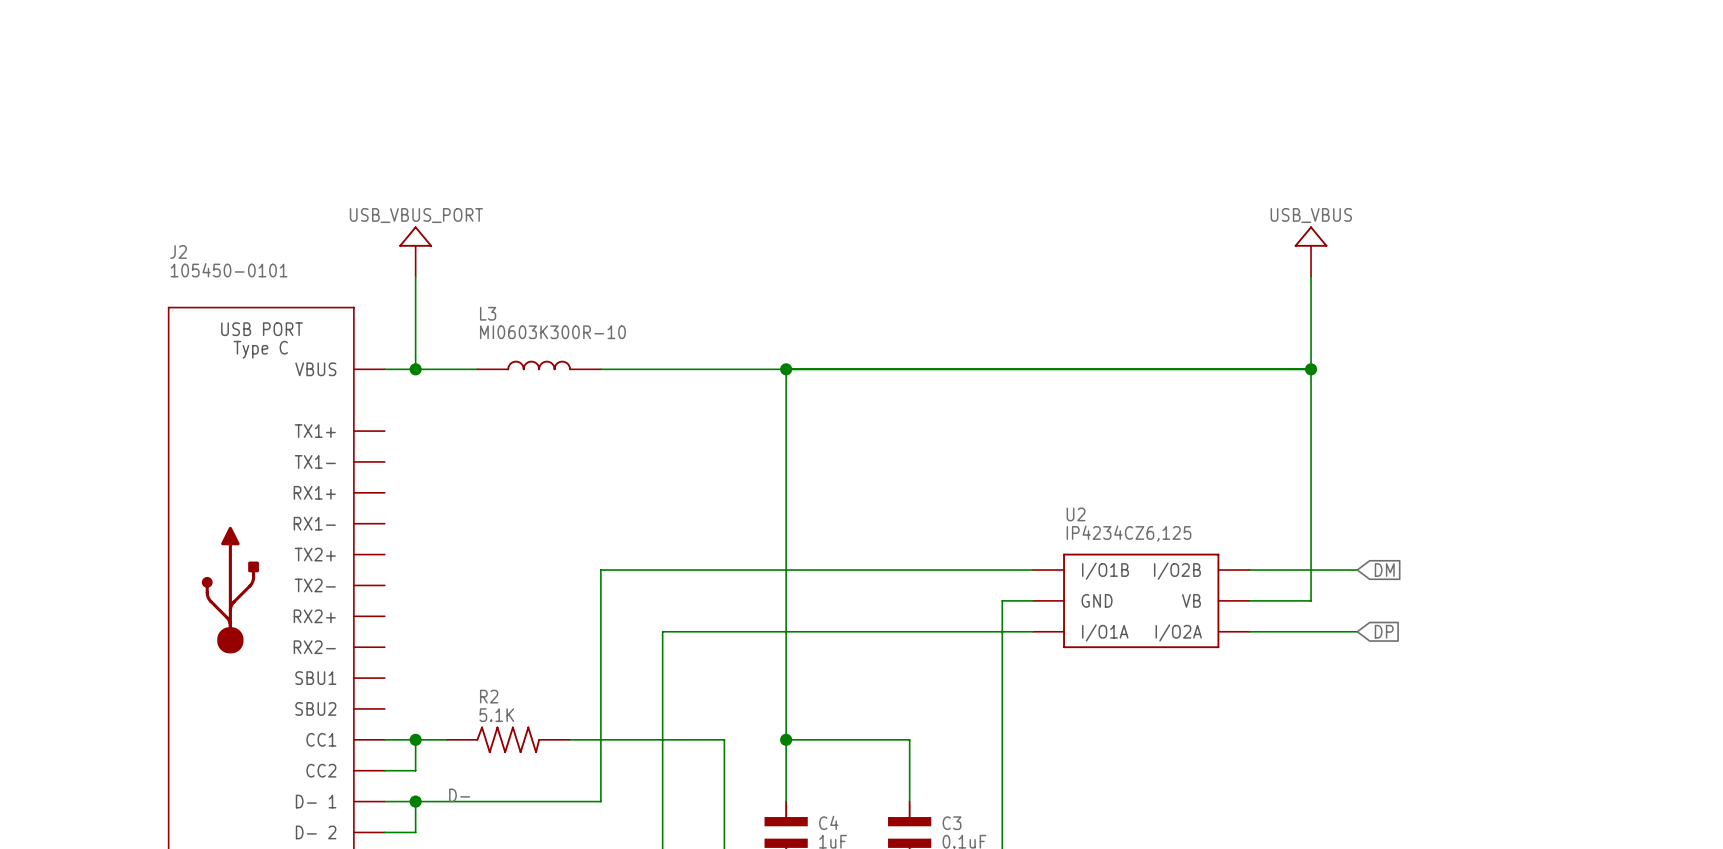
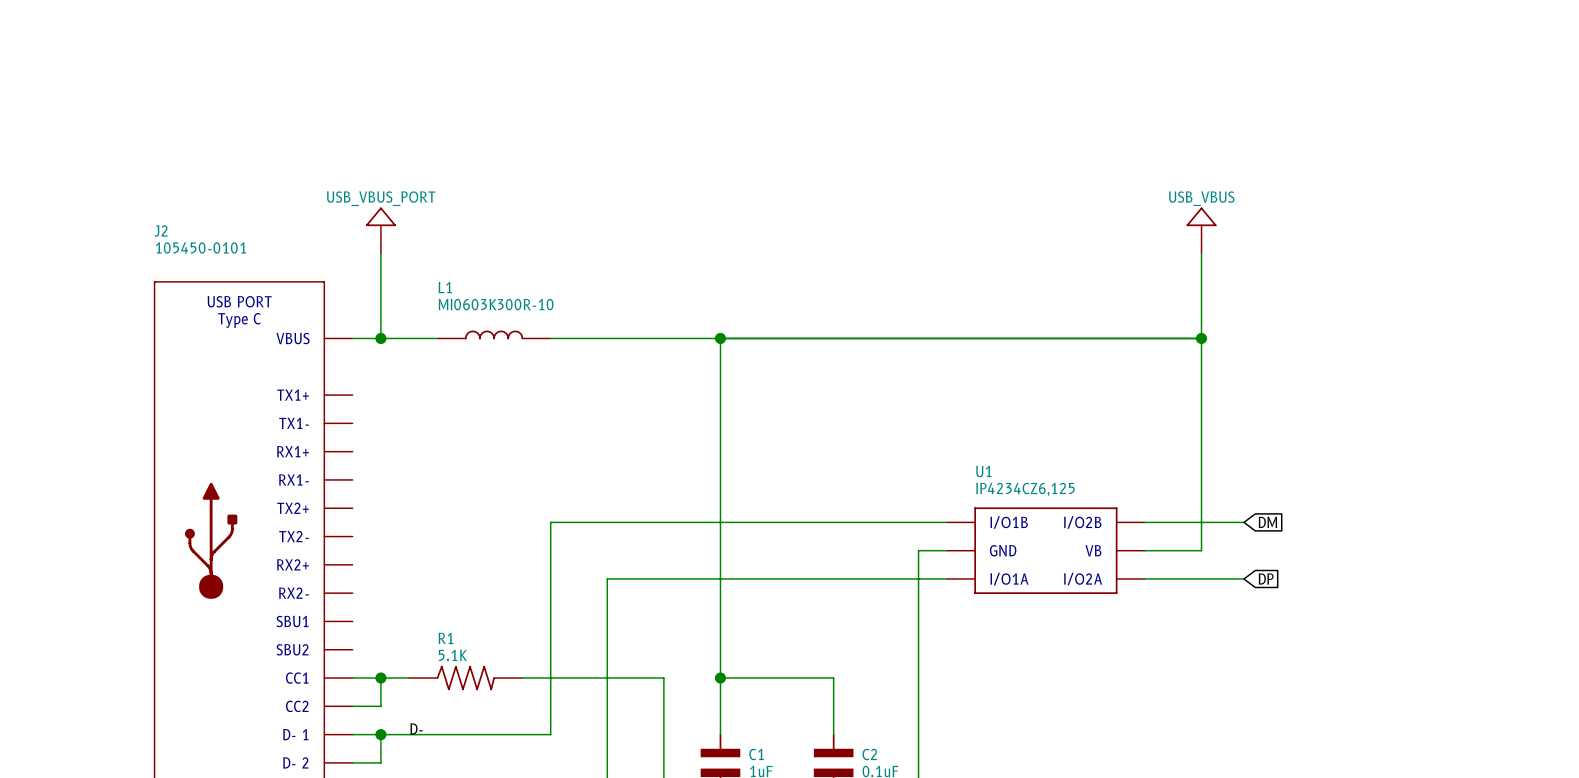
L3 name: L3 (488, 313) -> L1 (445, 287)
U2 name: U2 (1076, 514) -> U1 (983, 471)
R2 name: R2 (489, 696) -> R1 (445, 638)
C4 name: C4 (828, 822) -> C1 (756, 754)
C3 name: C3 (952, 823) -> C2 (869, 754)

